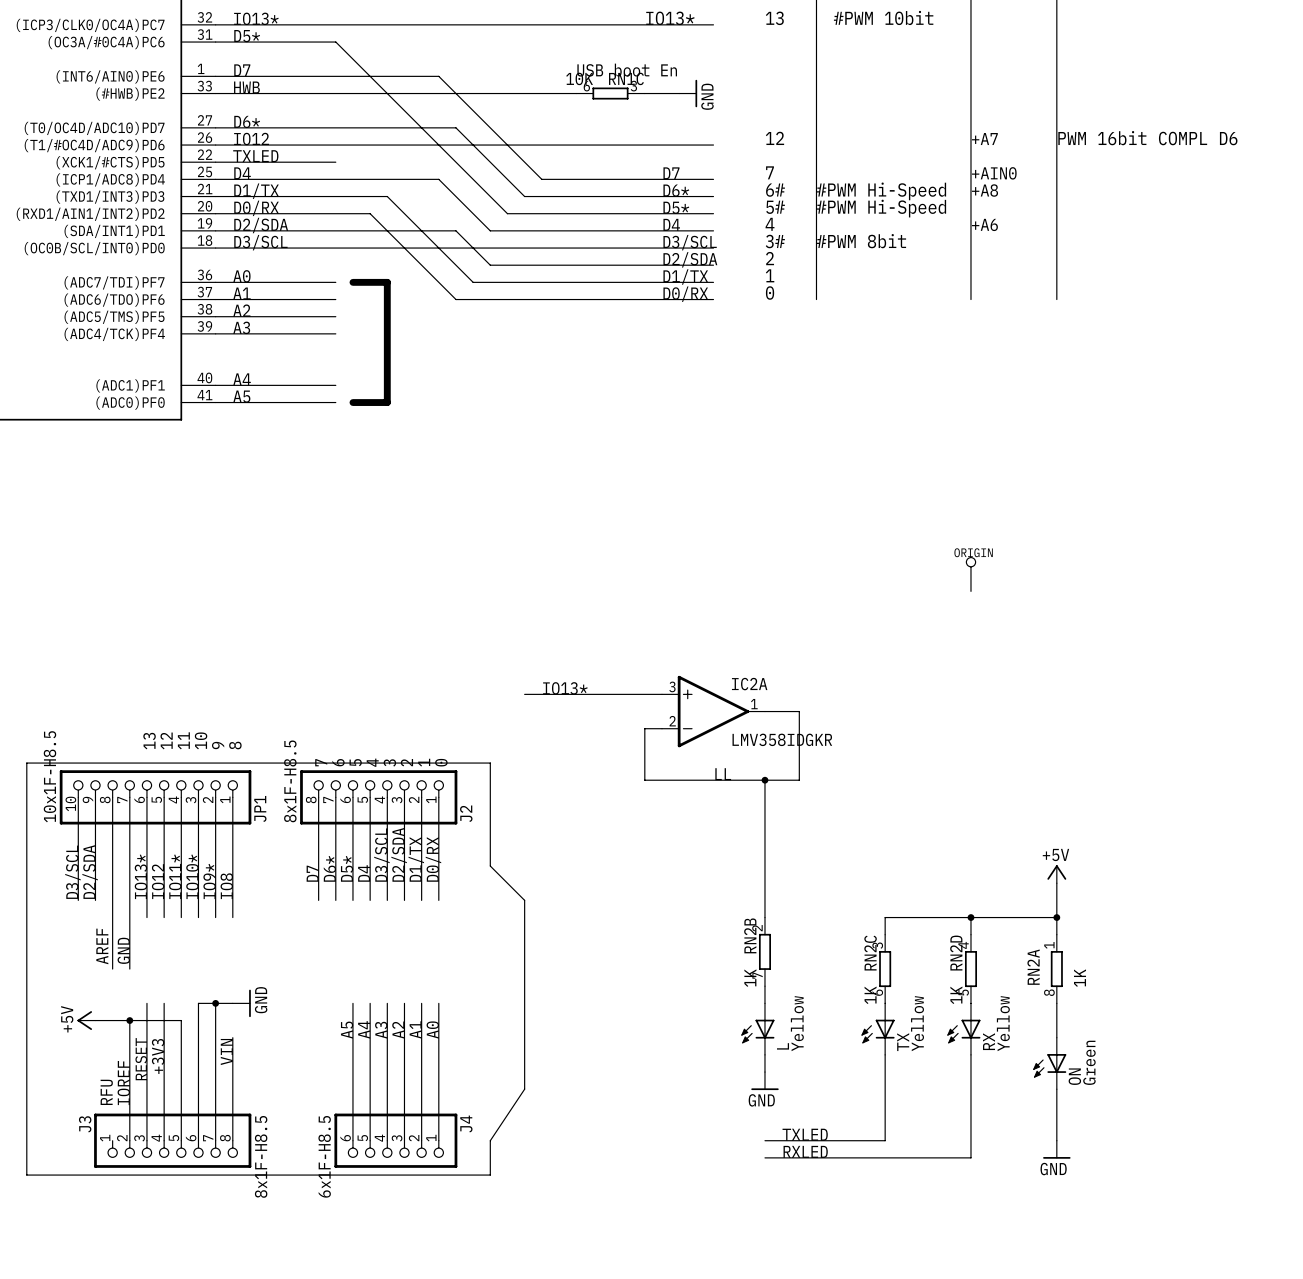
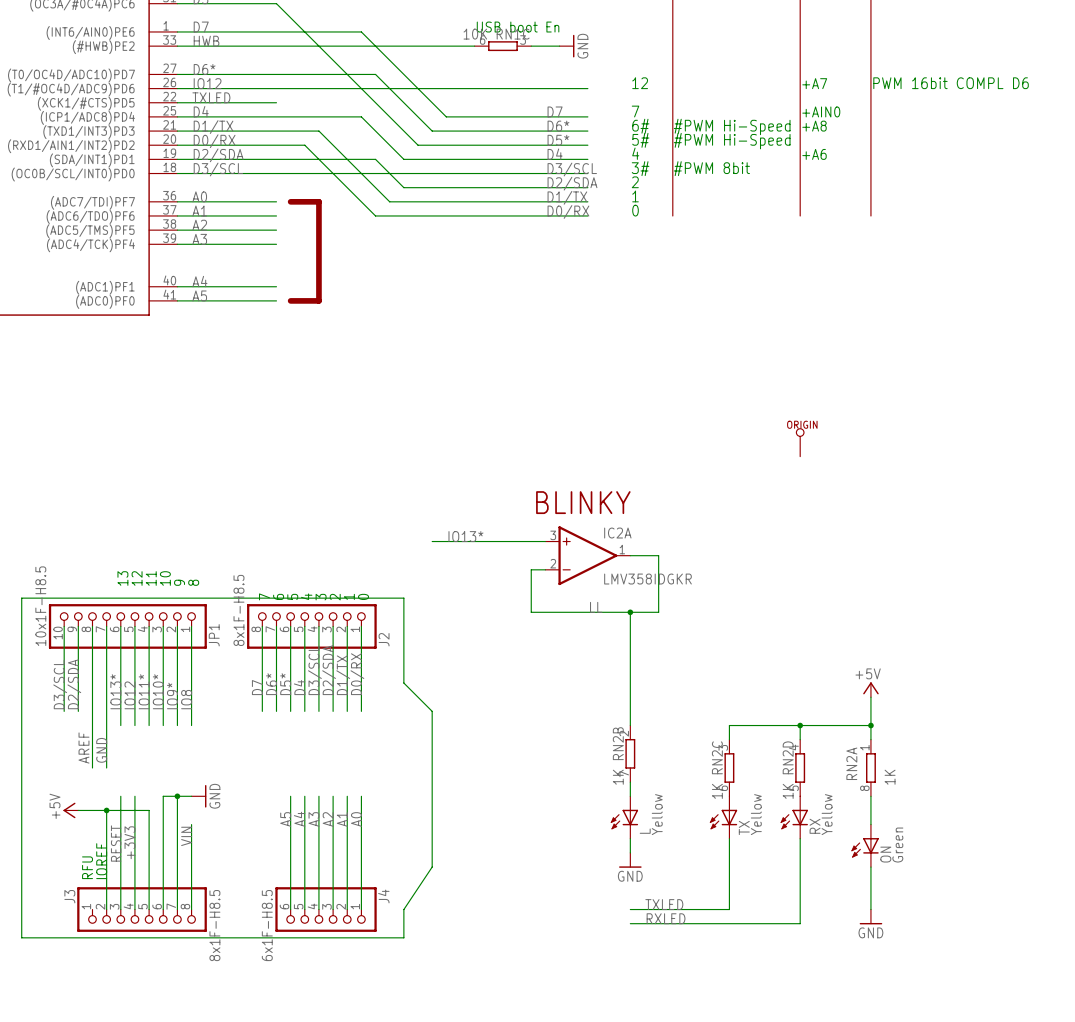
text: none -> BLINKY (583, 502)

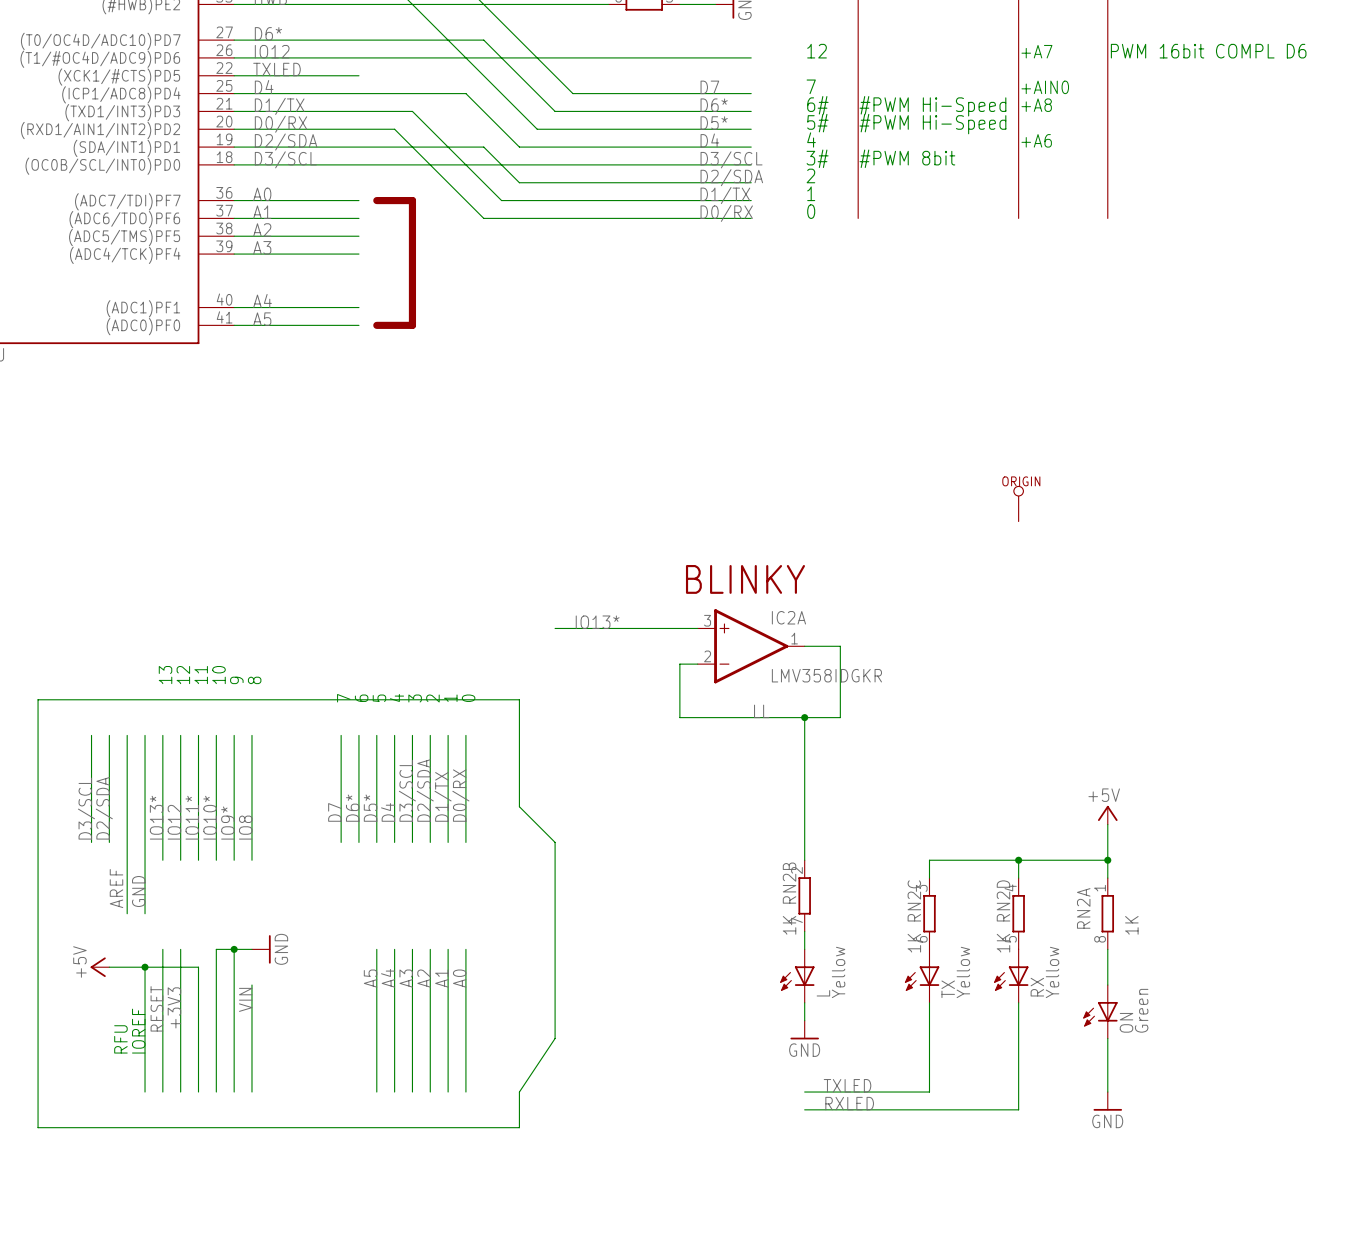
JP1: 10x1F-H8.5 (127, 626) -> none
J2: 8x1F-H8.5 (311, 626) -> none
J3: 8x1F-H8.5 (142, 909) -> none
J4: 6x1F-H8.5 (326, 909) -> none

